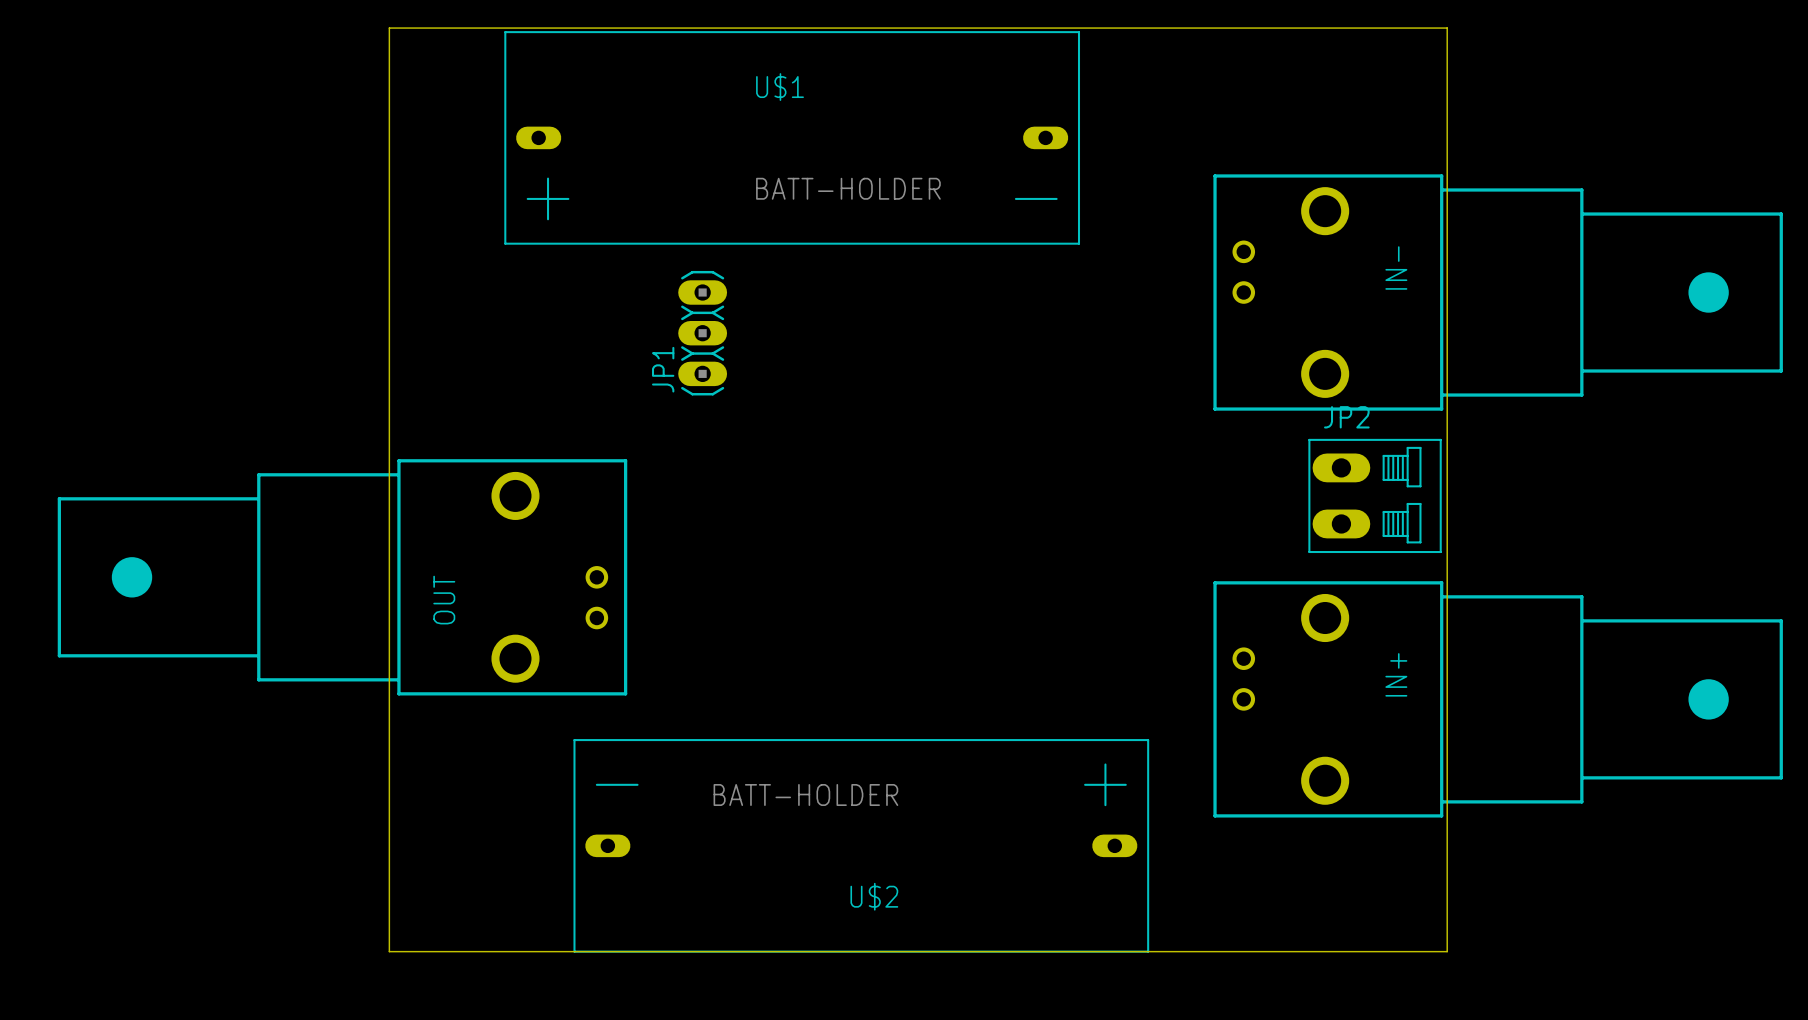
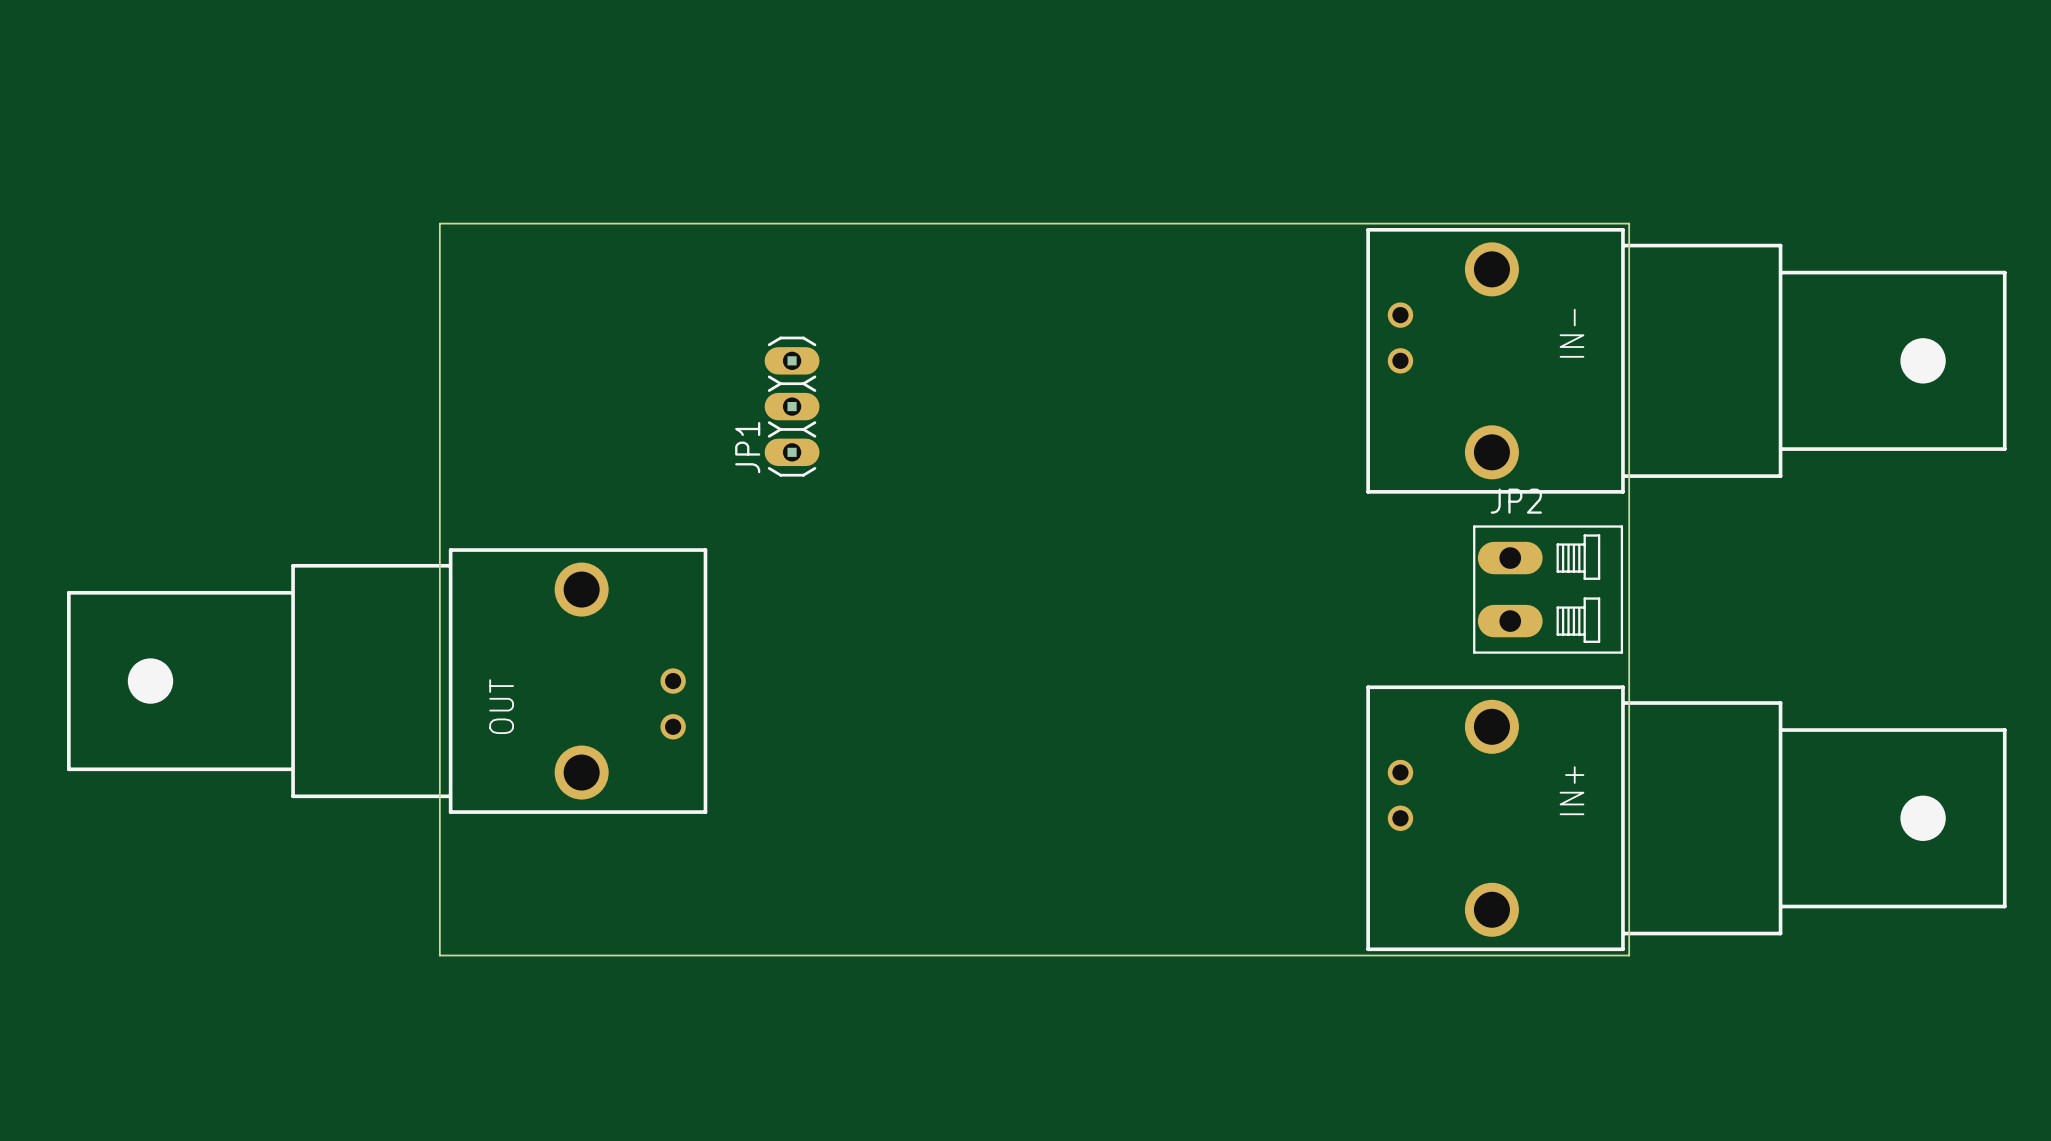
U$1: BATT-HOLDER (792, 137) -> none
board edge: (1447, 170) (1447, 28) (389, 28) (389, 170) -> (1629, 223) (439, 223)
board edge: (1447, 821) (1447, 951) (389, 951) (389, 821) -> (1629, 955) (439, 955)
U$2: BATT-HOLDER (861, 845) -> none

